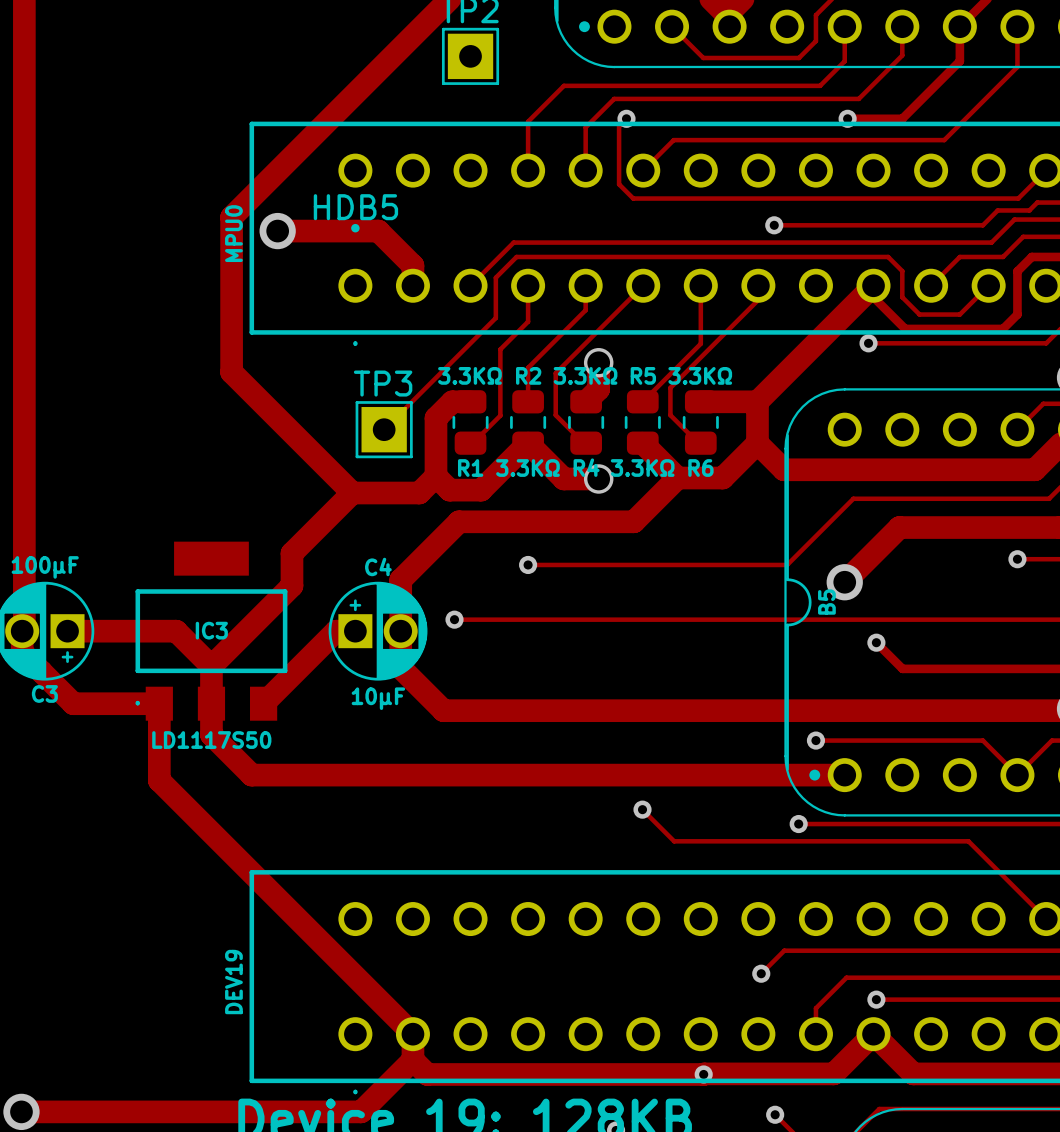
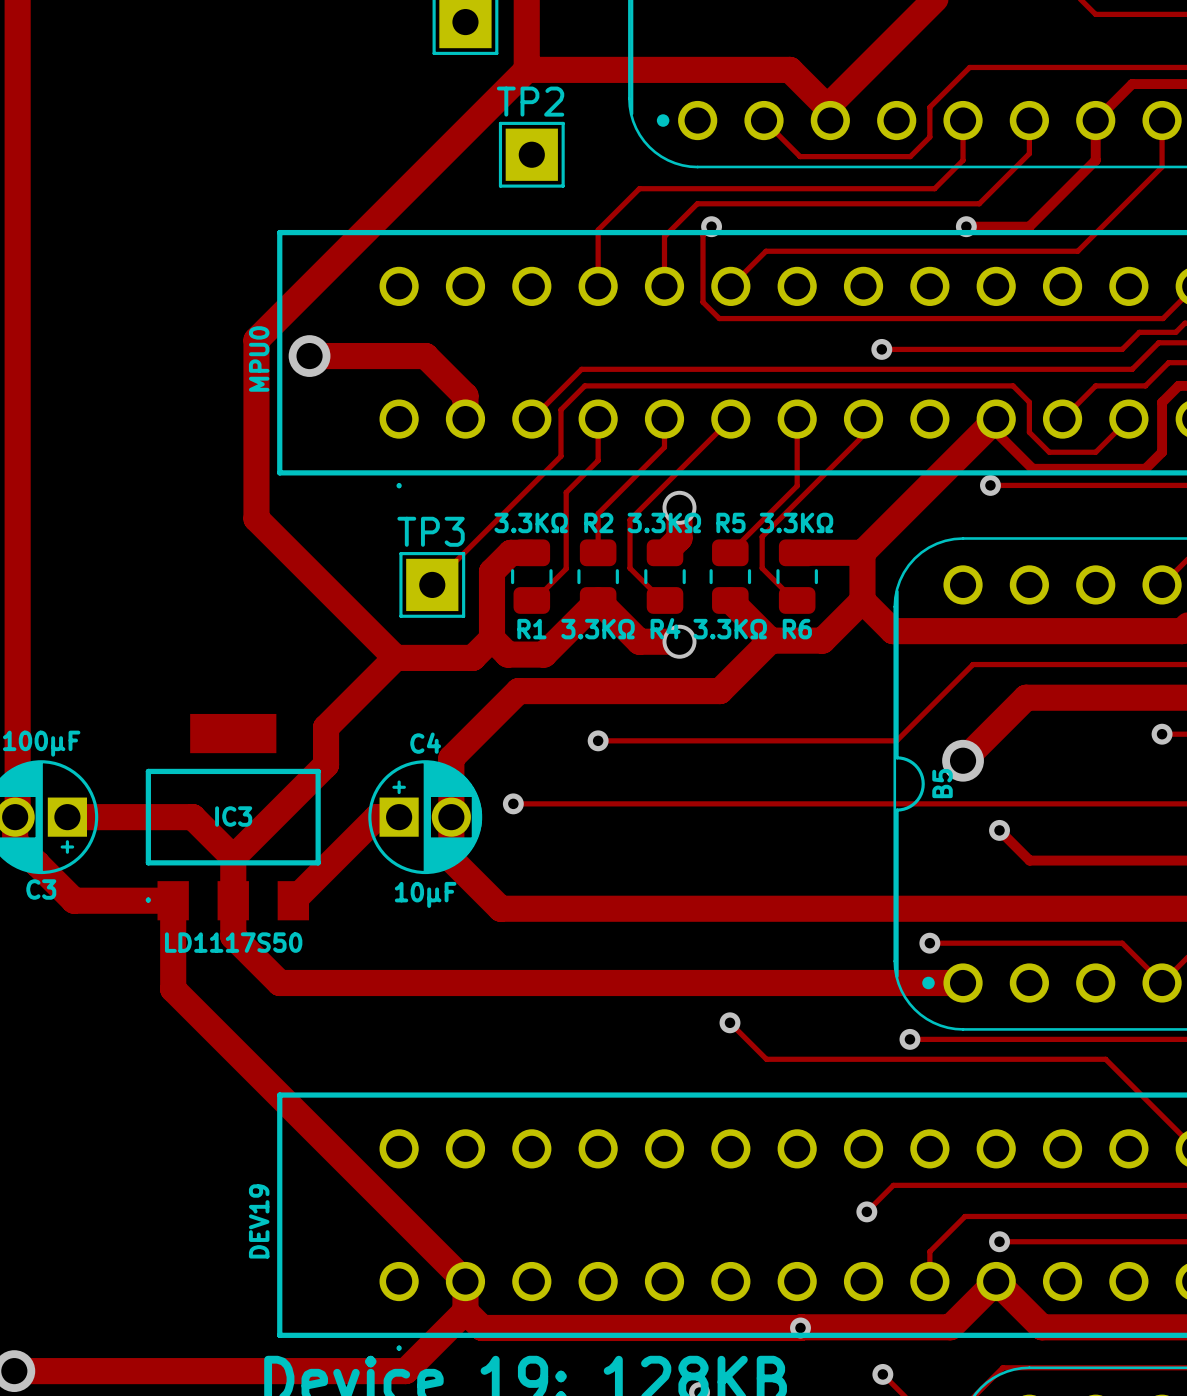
HDB5: (355, 228) -> none

